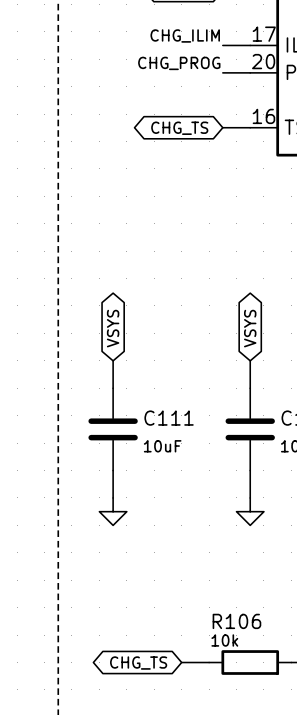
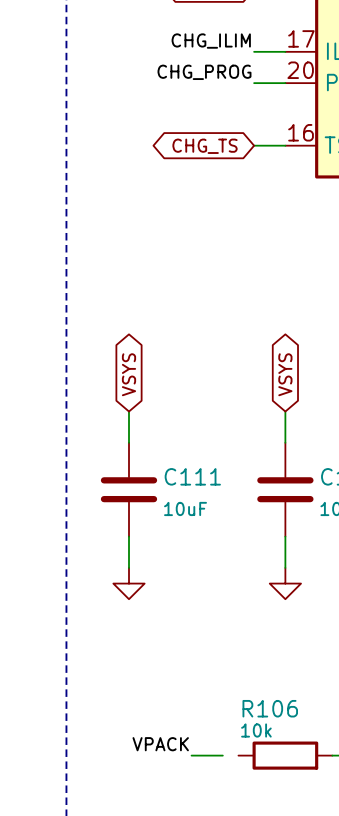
label: none -> VPACK (160, 744)
wire: (195, 662) (209, 662) -> (191, 755) (207, 755)
global label: CHG_TS (138, 663) -> none

